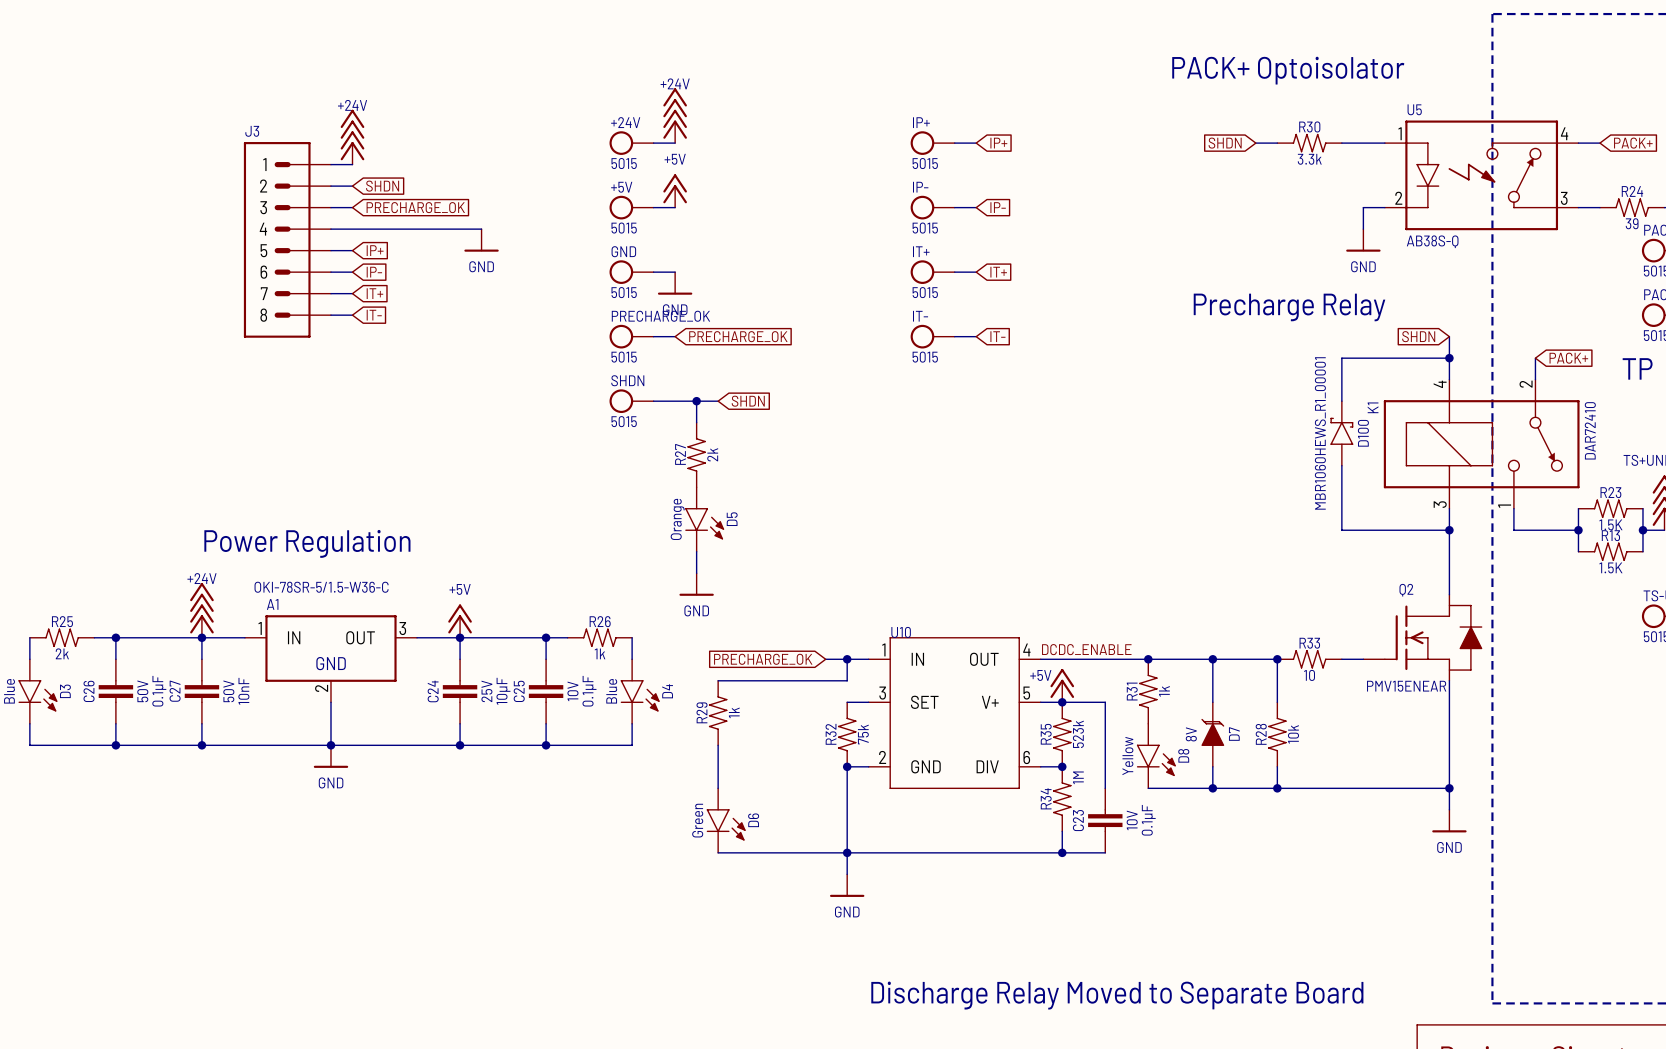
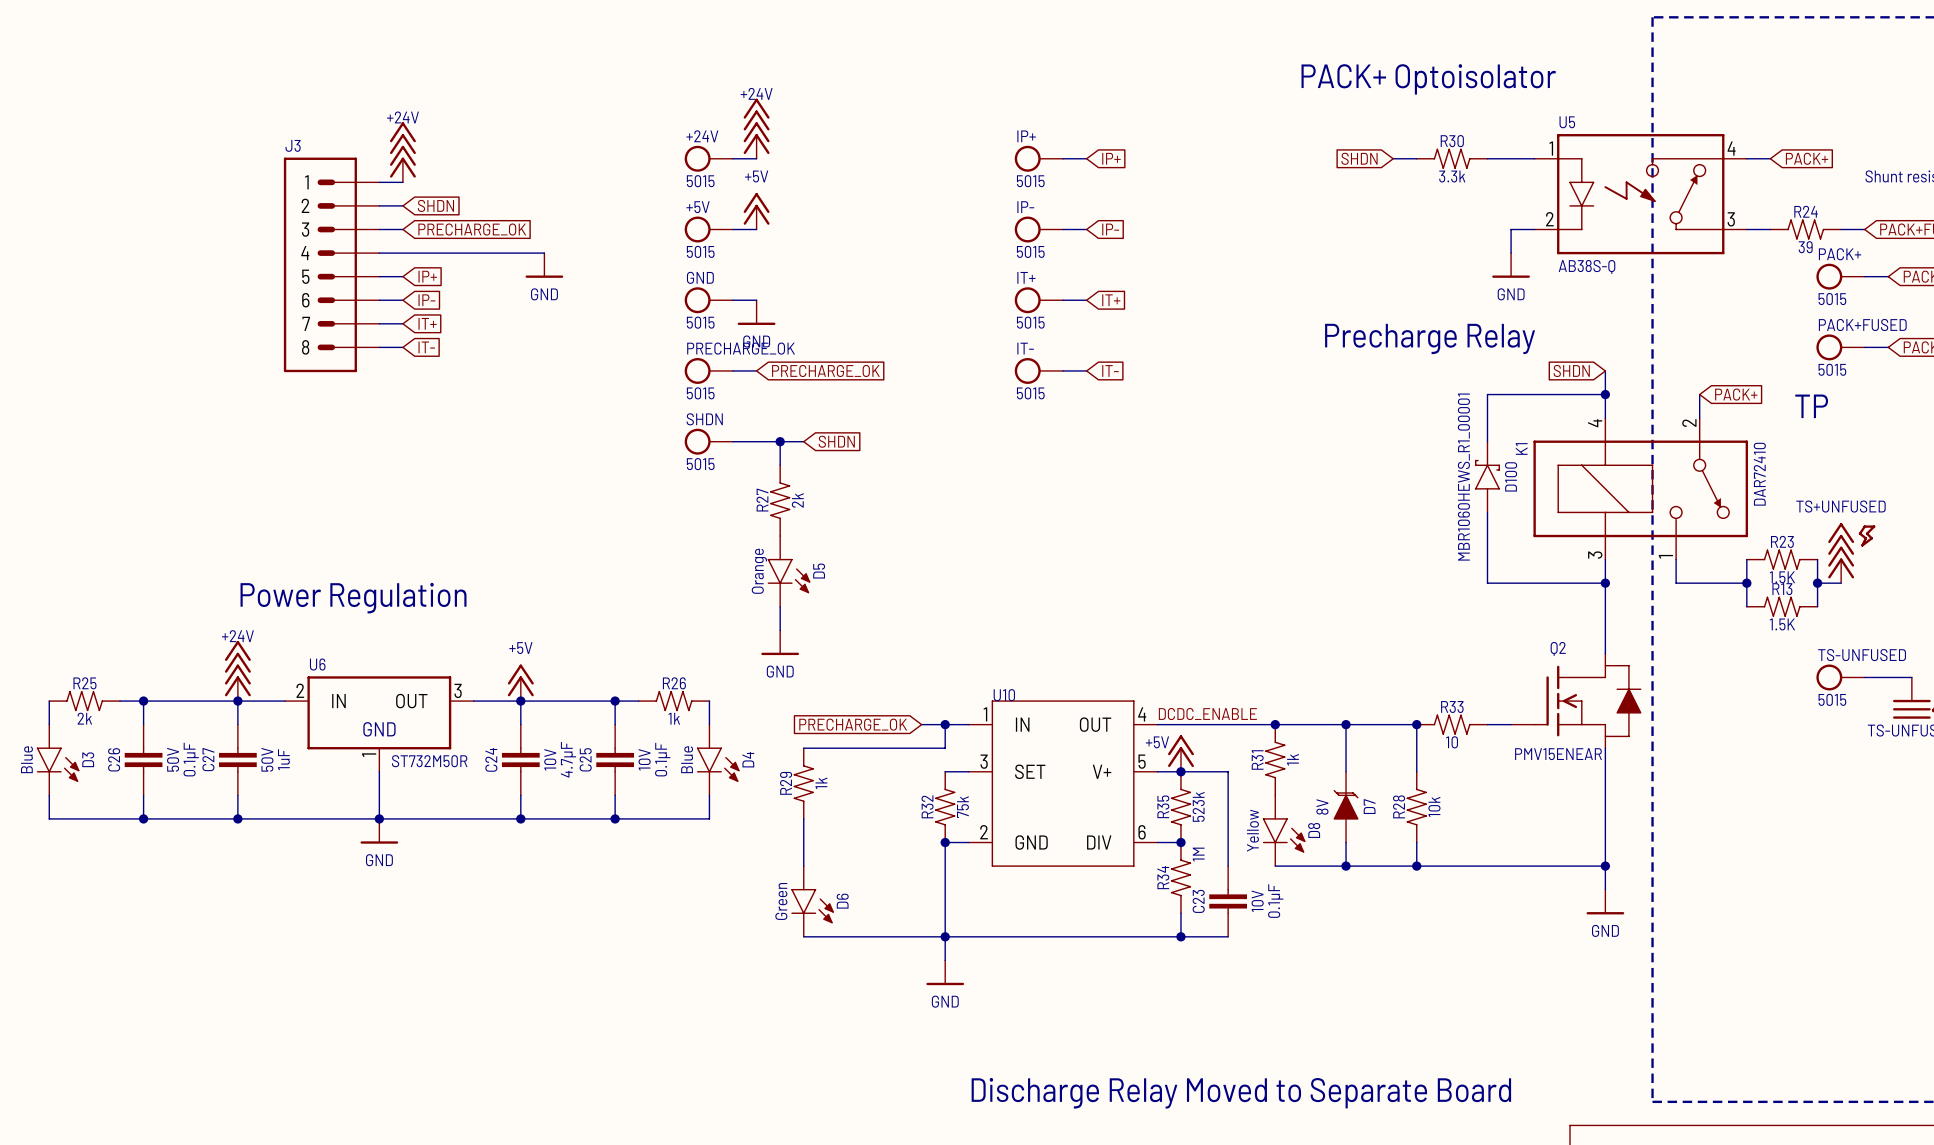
A1 text: OKI-78SR-5/1.5-W36-C (321, 587) -> ST732M50R (429, 761)
A1 name: A1 (272, 604) -> U6 (317, 664)
A1 pin number: 1 (260, 628) -> 2 (300, 690)
A1 pin number: 2 (321, 688) -> 1 (369, 755)
C27 text: 10nF (243, 691) -> 1uF (283, 759)
C24 text: 25V (486, 691) -> 10V (550, 759)
C24 text: 10µF (503, 691) -> 4.7µF (568, 759)

